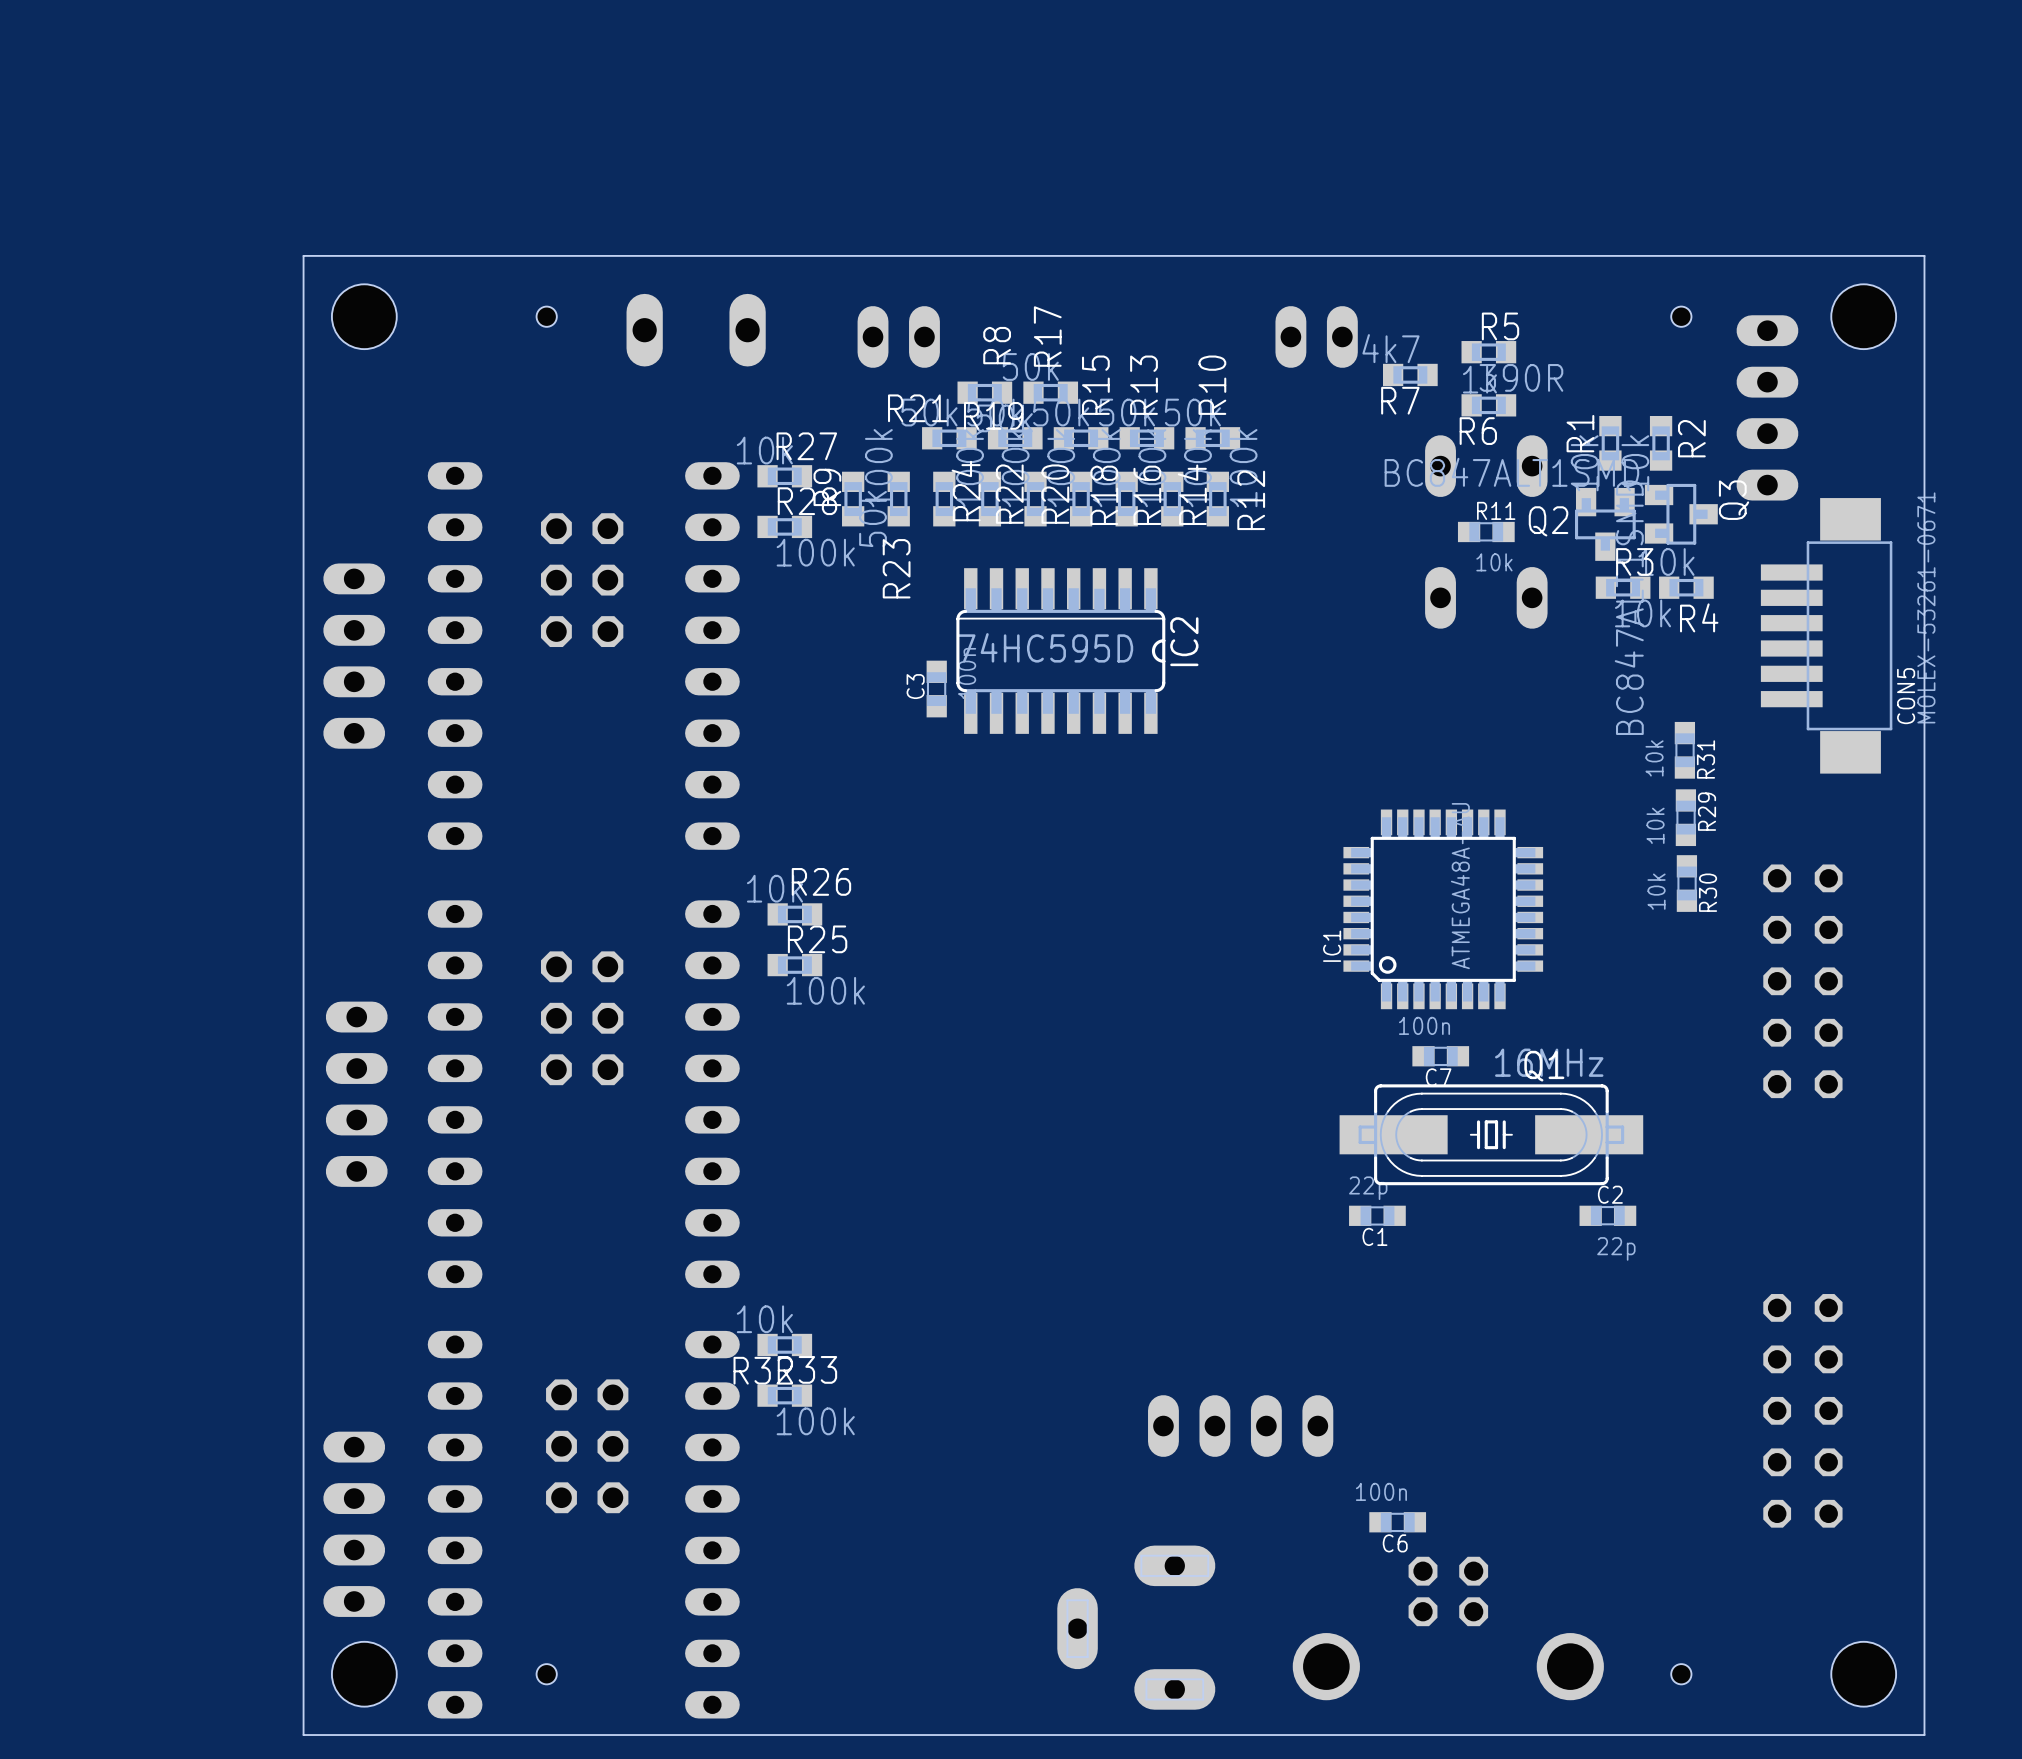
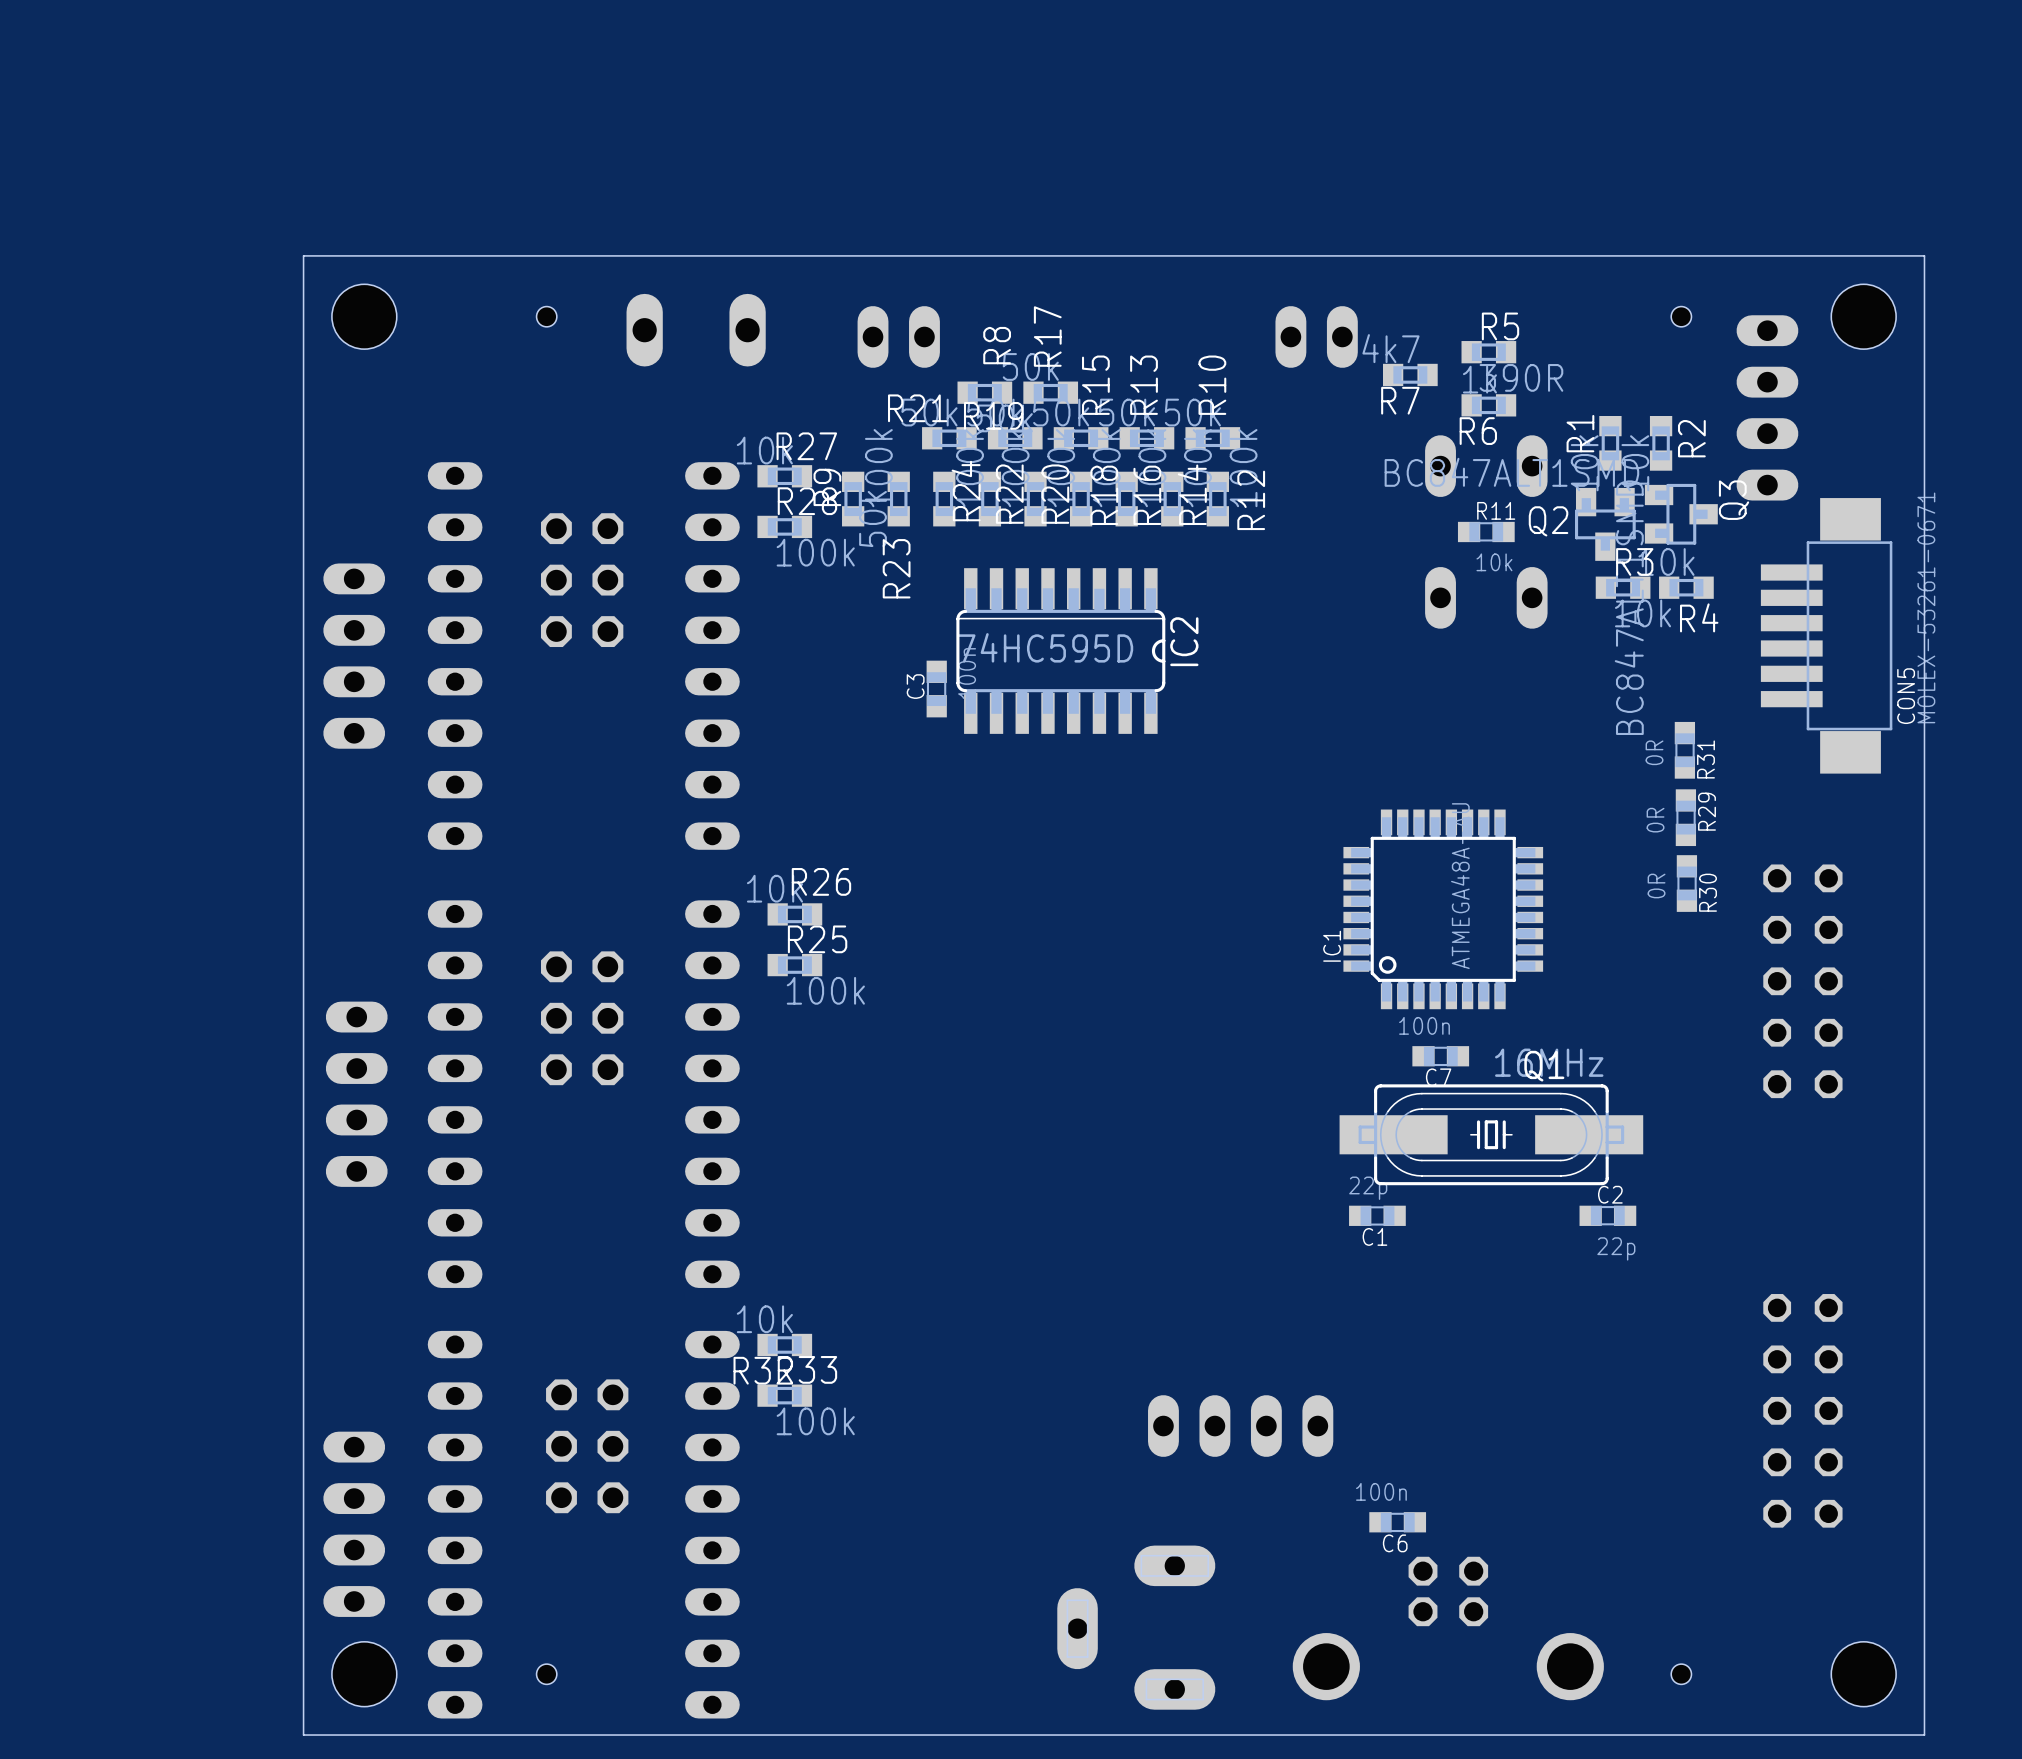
R31 value: 10k (1654, 758) -> 0R (1654, 752)
R29 value: 10k (1655, 825) -> 0R (1655, 820)
R30 value: 10k (1656, 891) -> 0R (1656, 886)

